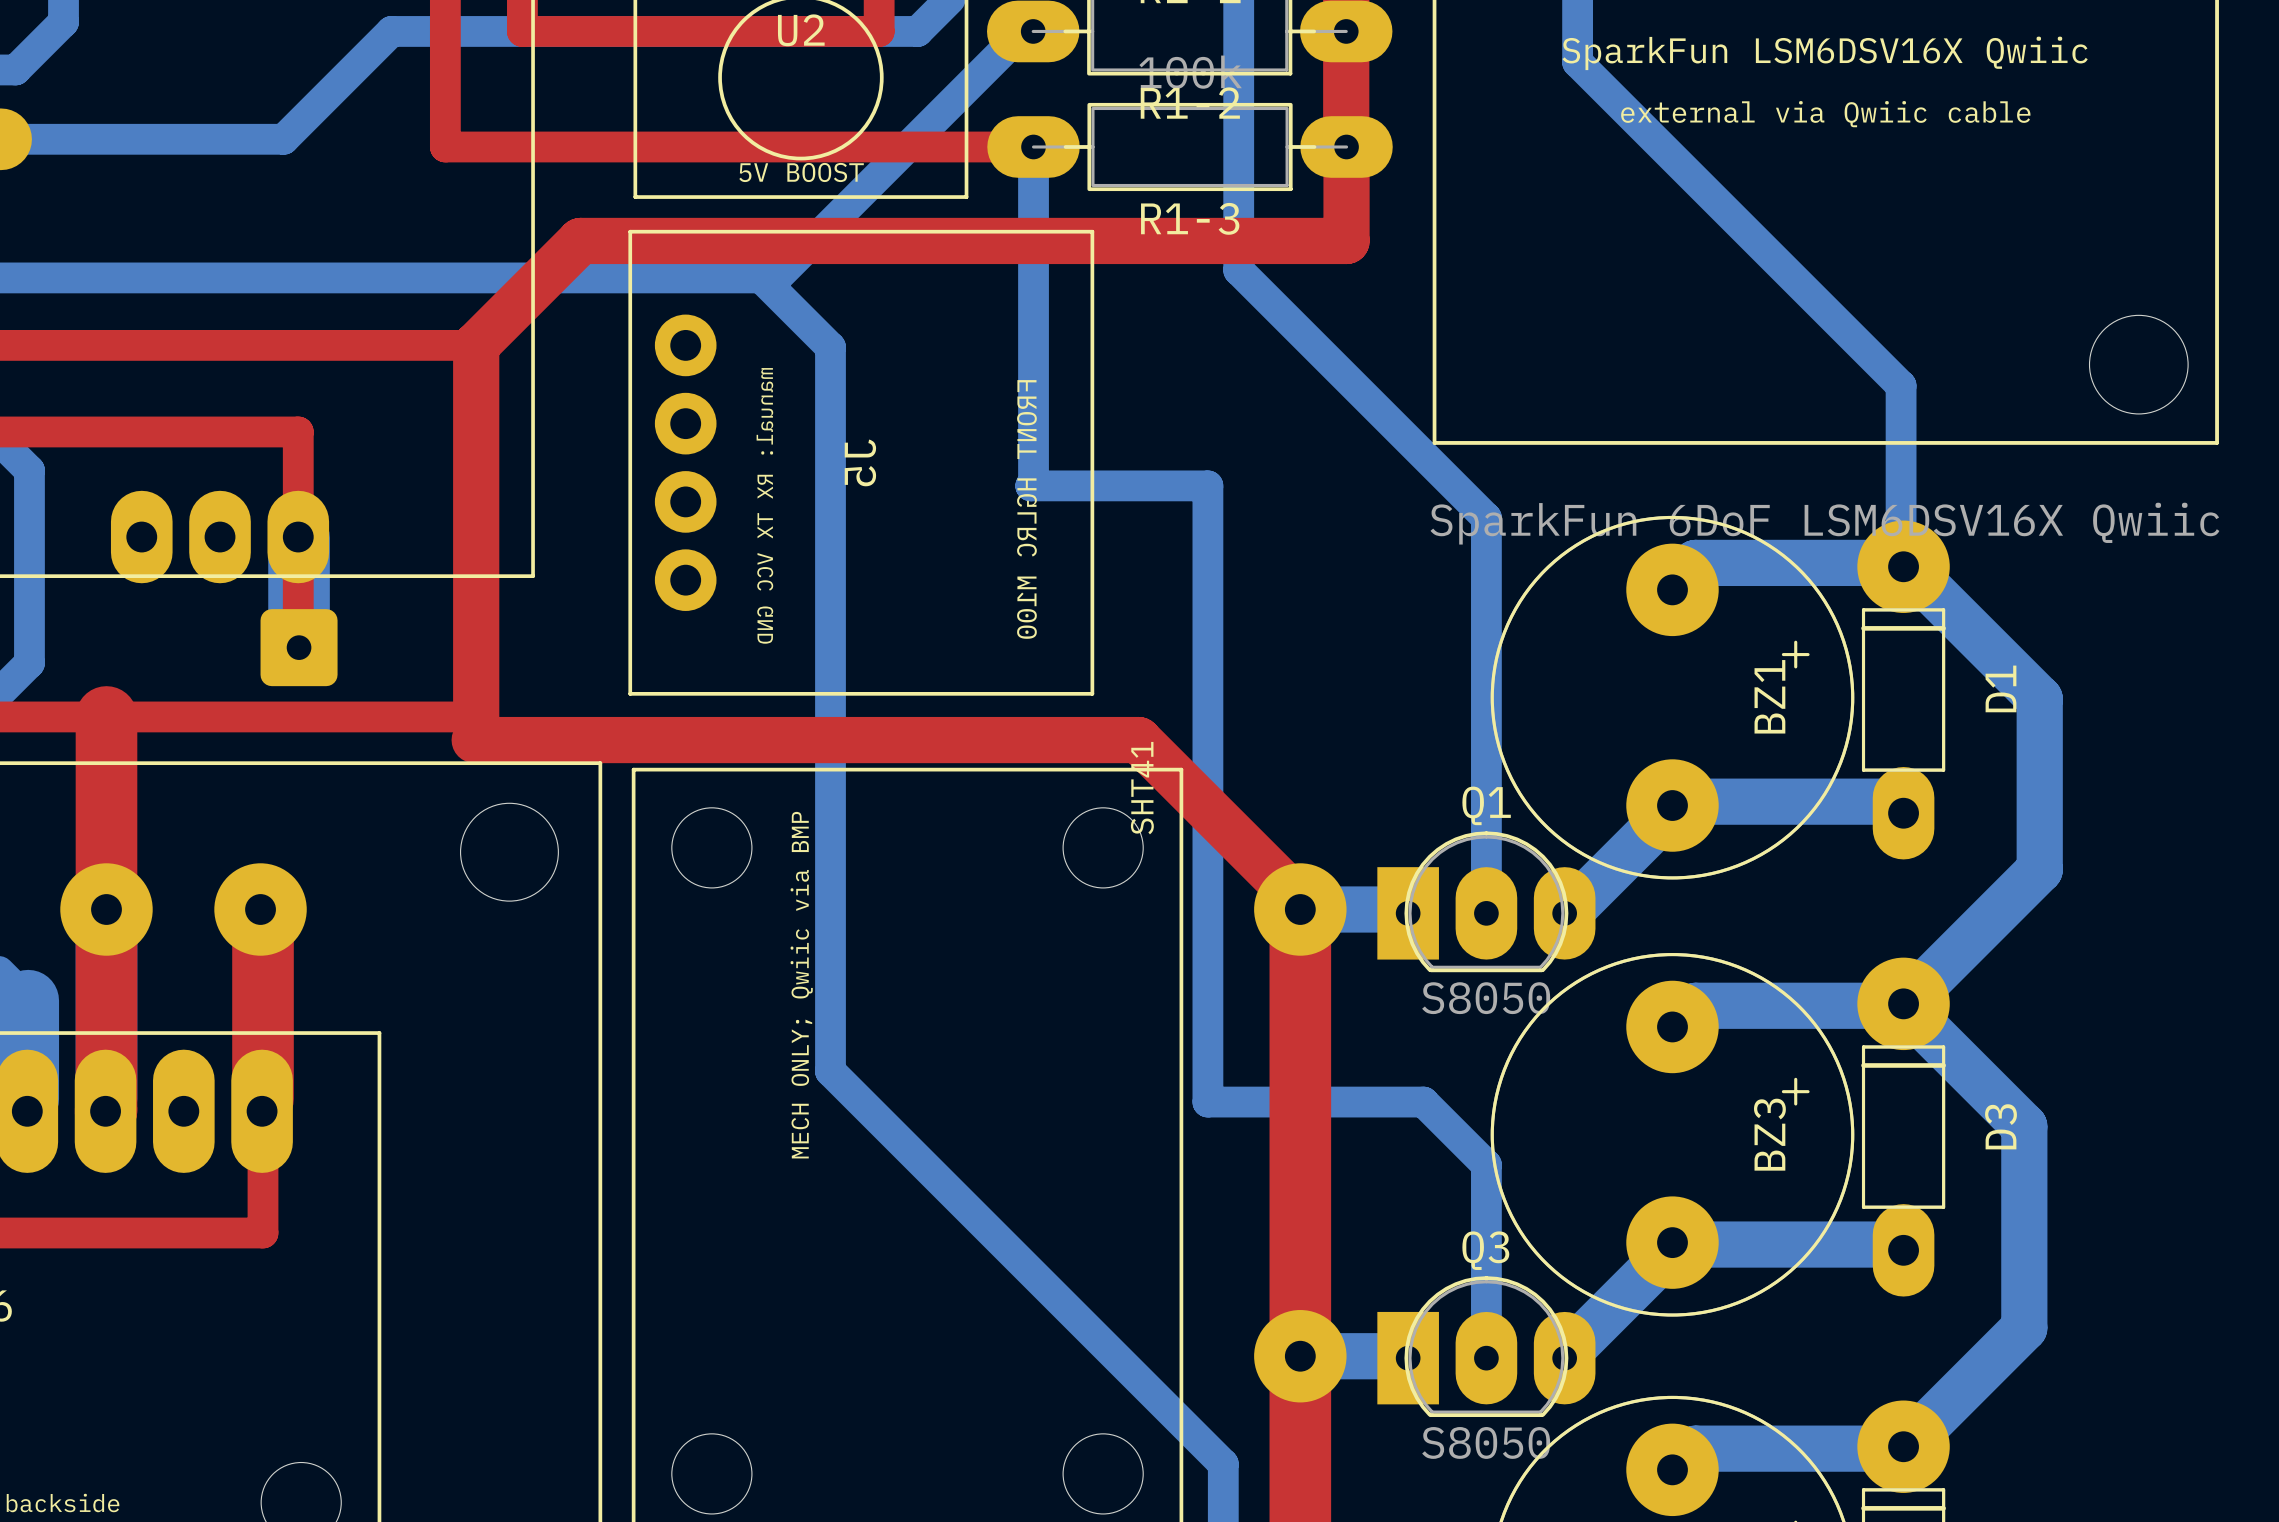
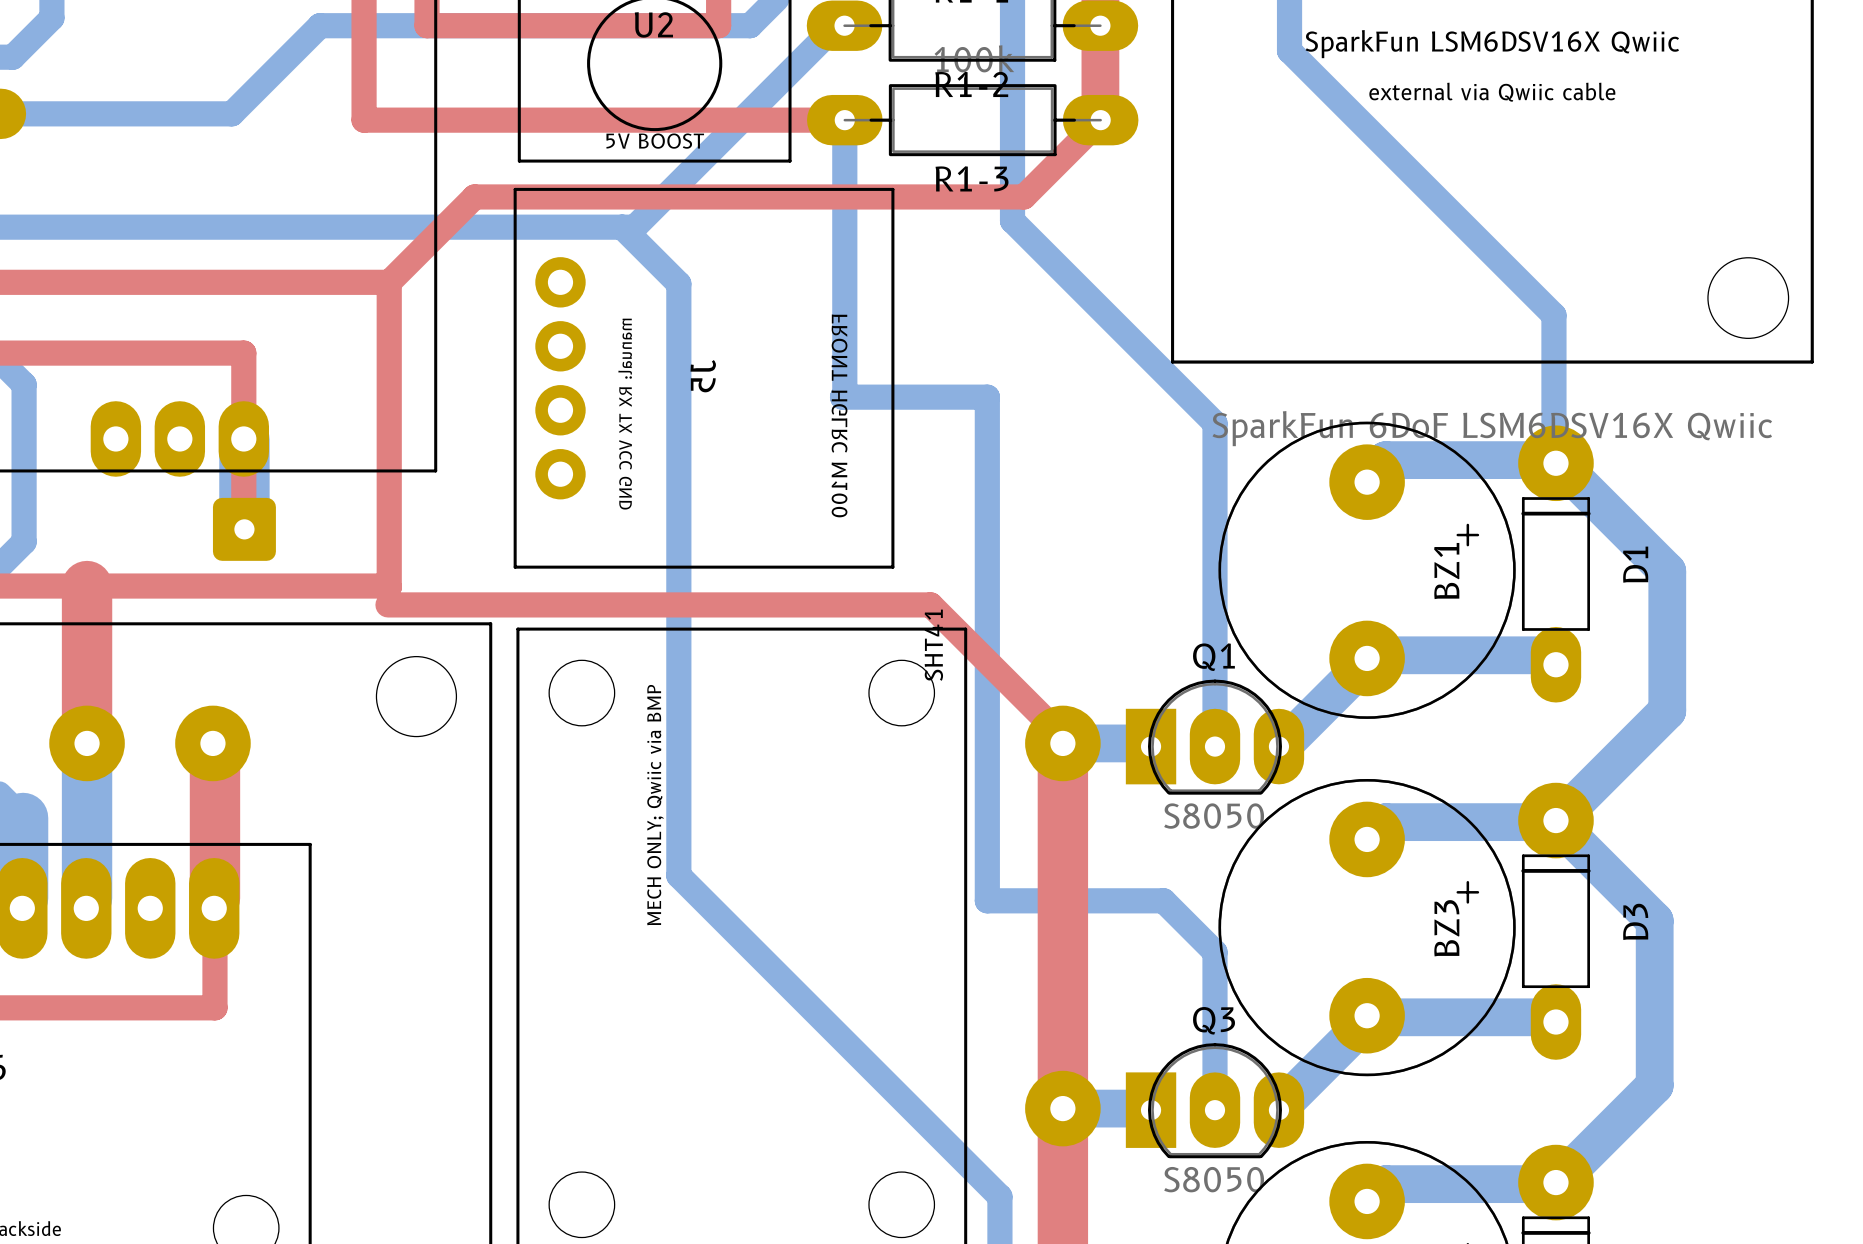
top track: (1346, 146) (1346, 240) (1252, 240) -> (1100, 120) (1023, 196)
top track width: thick (1252, 240) (580, 240) (476, 345) (476, 718) -> thin (1023, 196) (474, 196) (389, 282) (389, 587)
top track width: thick (474, 740) (1138, 740) (1300, 901) (1300, 909) -> thin (387, 604) (930, 604) (1062, 737) (1062, 743)
top track: (106, 909) (105, 1111) -> none

